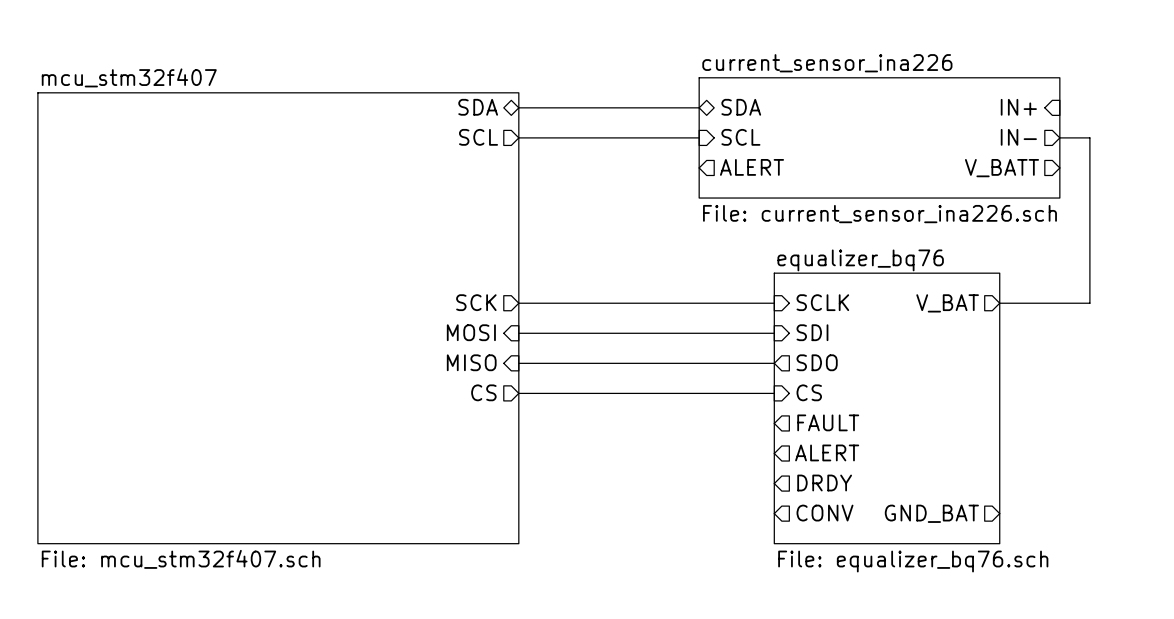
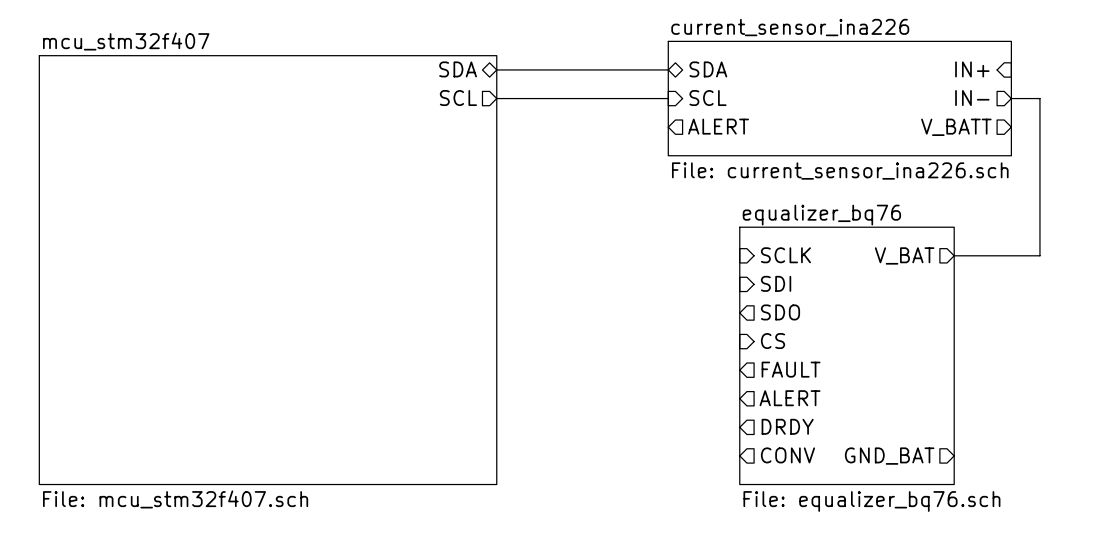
sheet pin: SCK (476, 302) -> none
wire: (518, 303) (774, 303) -> none
sheet pin: MOSI (471, 332) -> none
wire: (518, 333) (774, 333) -> none
sheet pin: MISO (471, 362) -> none
wire: (518, 363) (774, 363) -> none
sheet pin: CS (483, 392) -> none
wire: (518, 393) (774, 393) -> none

